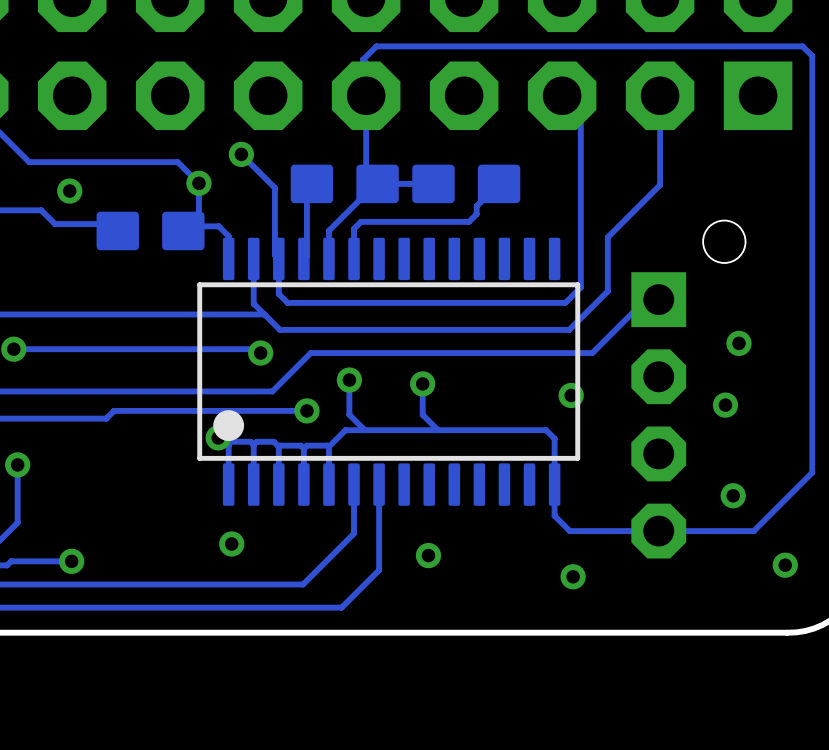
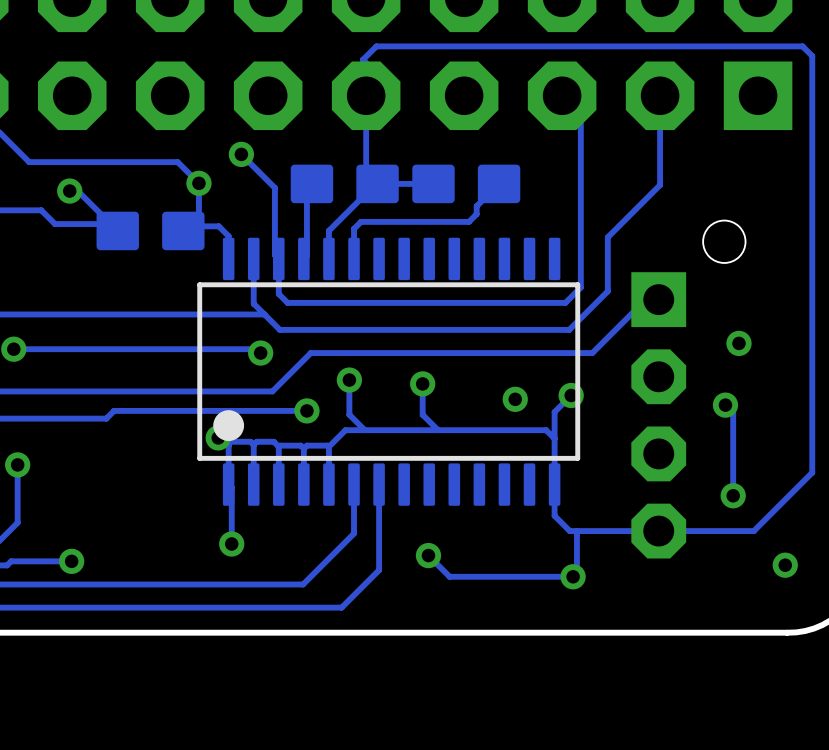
track: none -> (69, 191) (77, 191) (110, 224)
track: none -> (571, 395) (554, 412) (554, 438)
via: none -> (515, 399)
track: none -> (725, 405) (733, 412) (733, 495)
track: none -> (228, 484) (231, 487) (231, 543)
track: none -> (576, 531) (576, 572) (573, 576) (449, 576) (428, 555)

